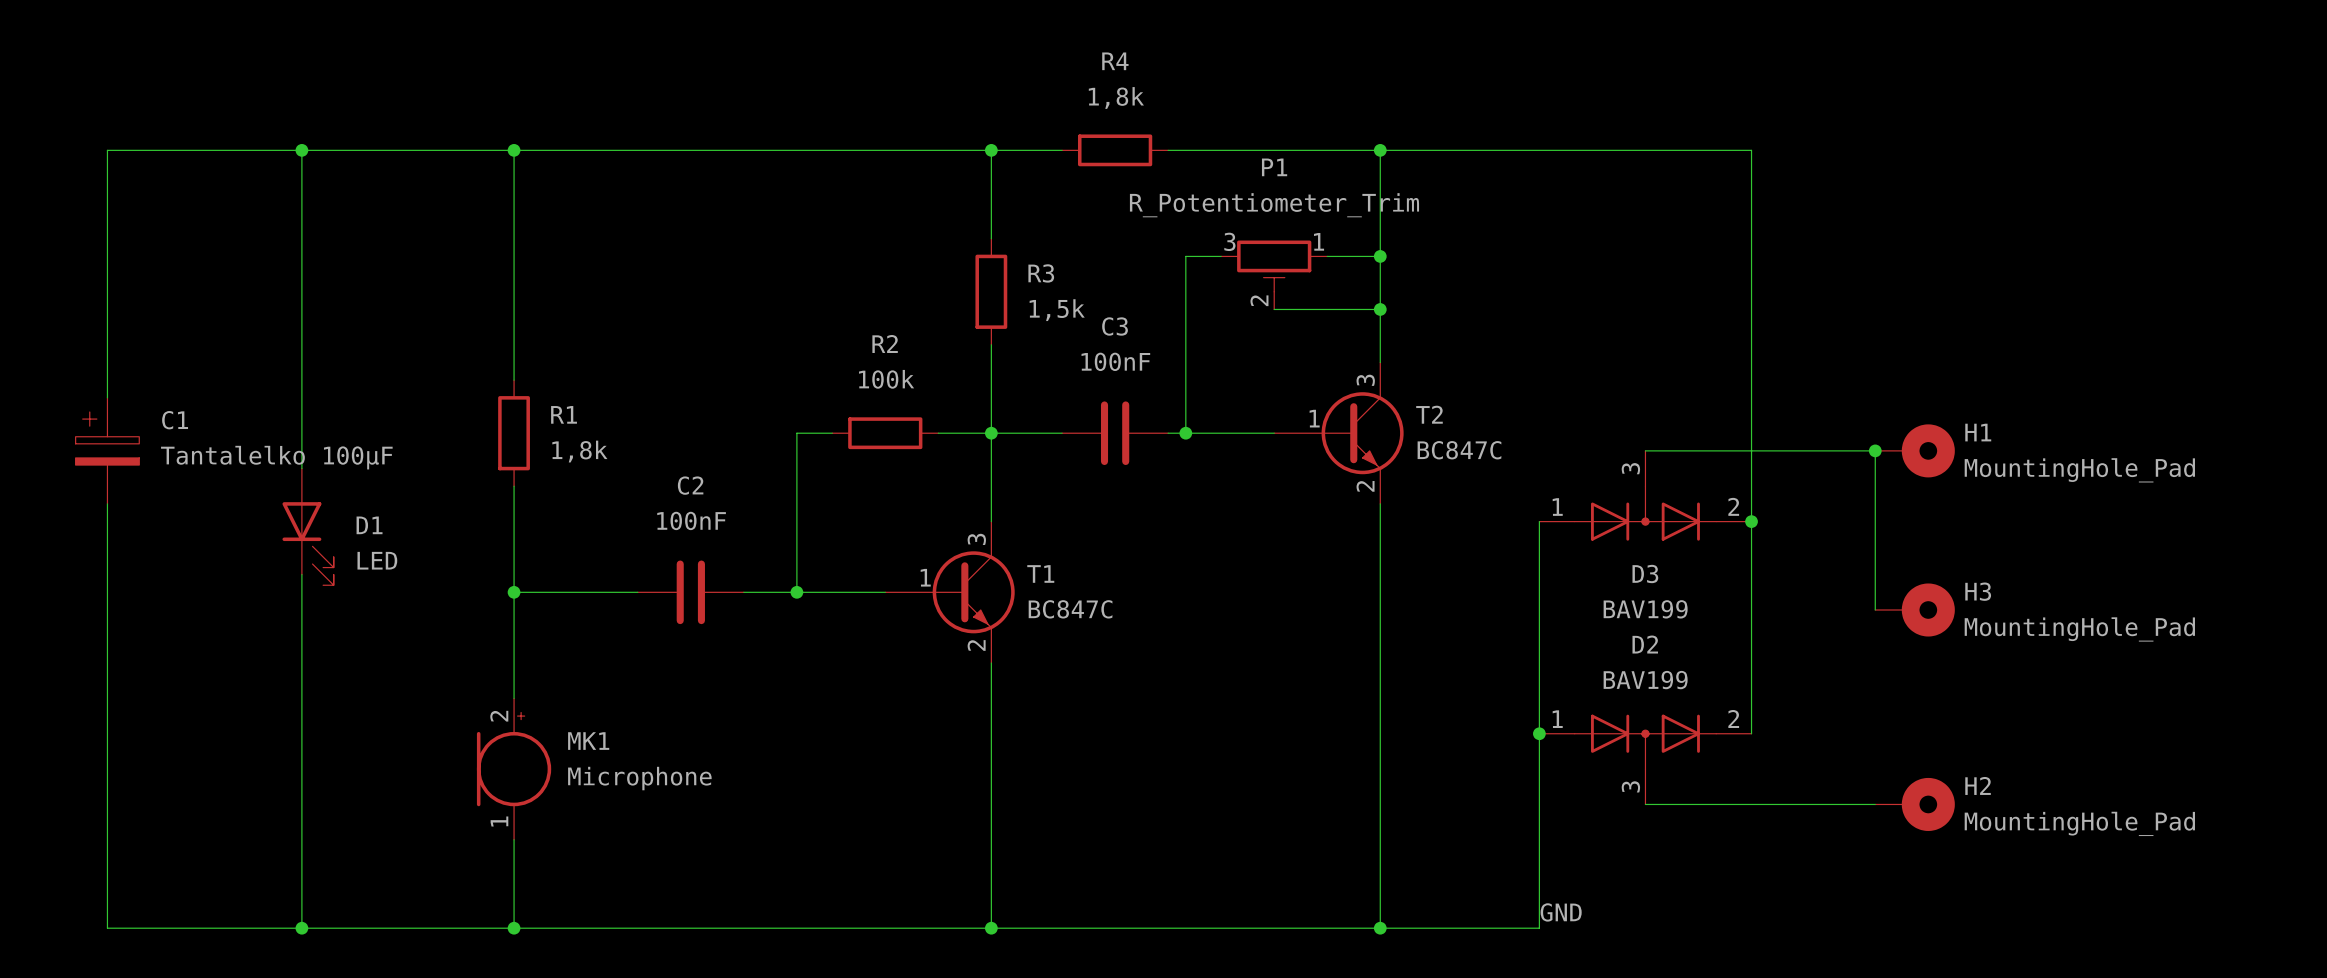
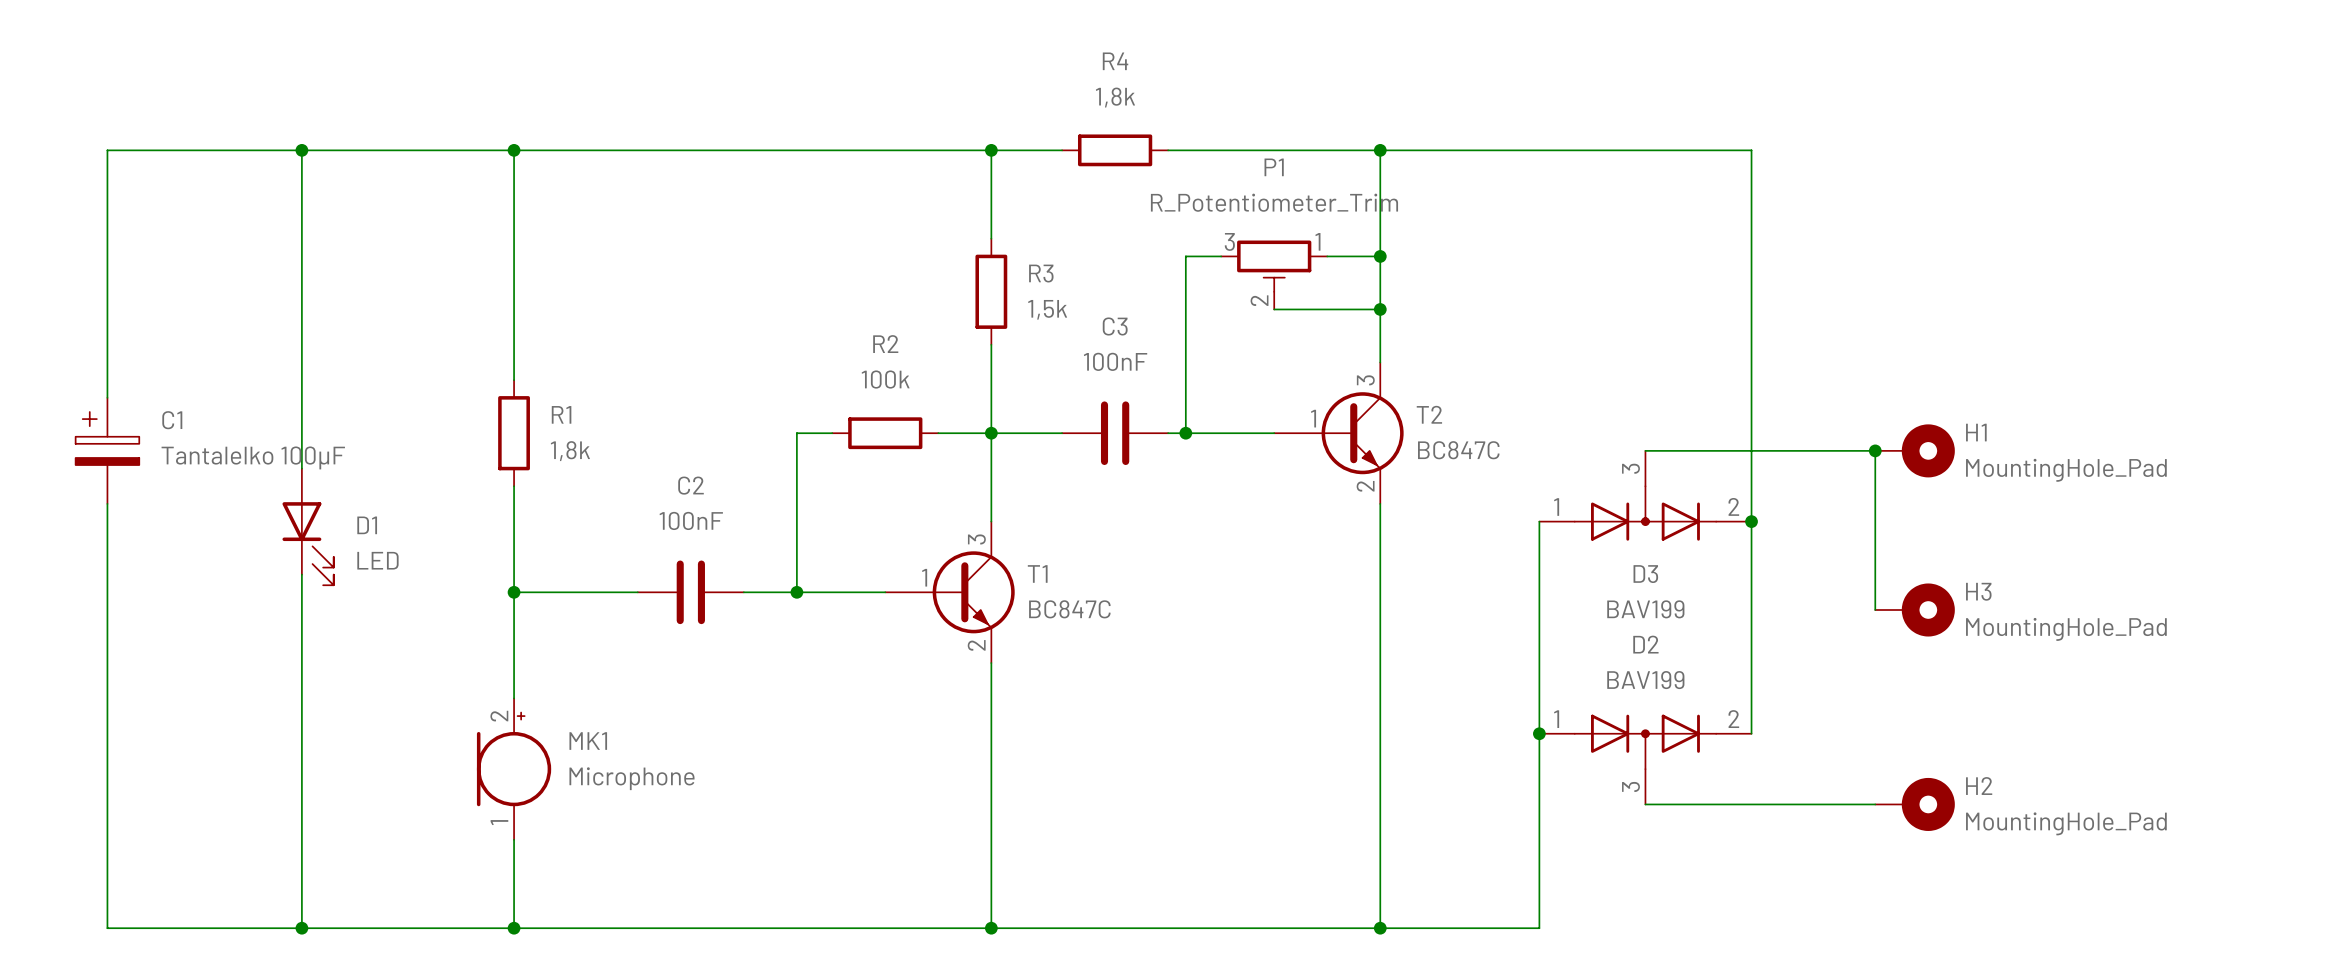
label: GND (1561, 912) -> none

